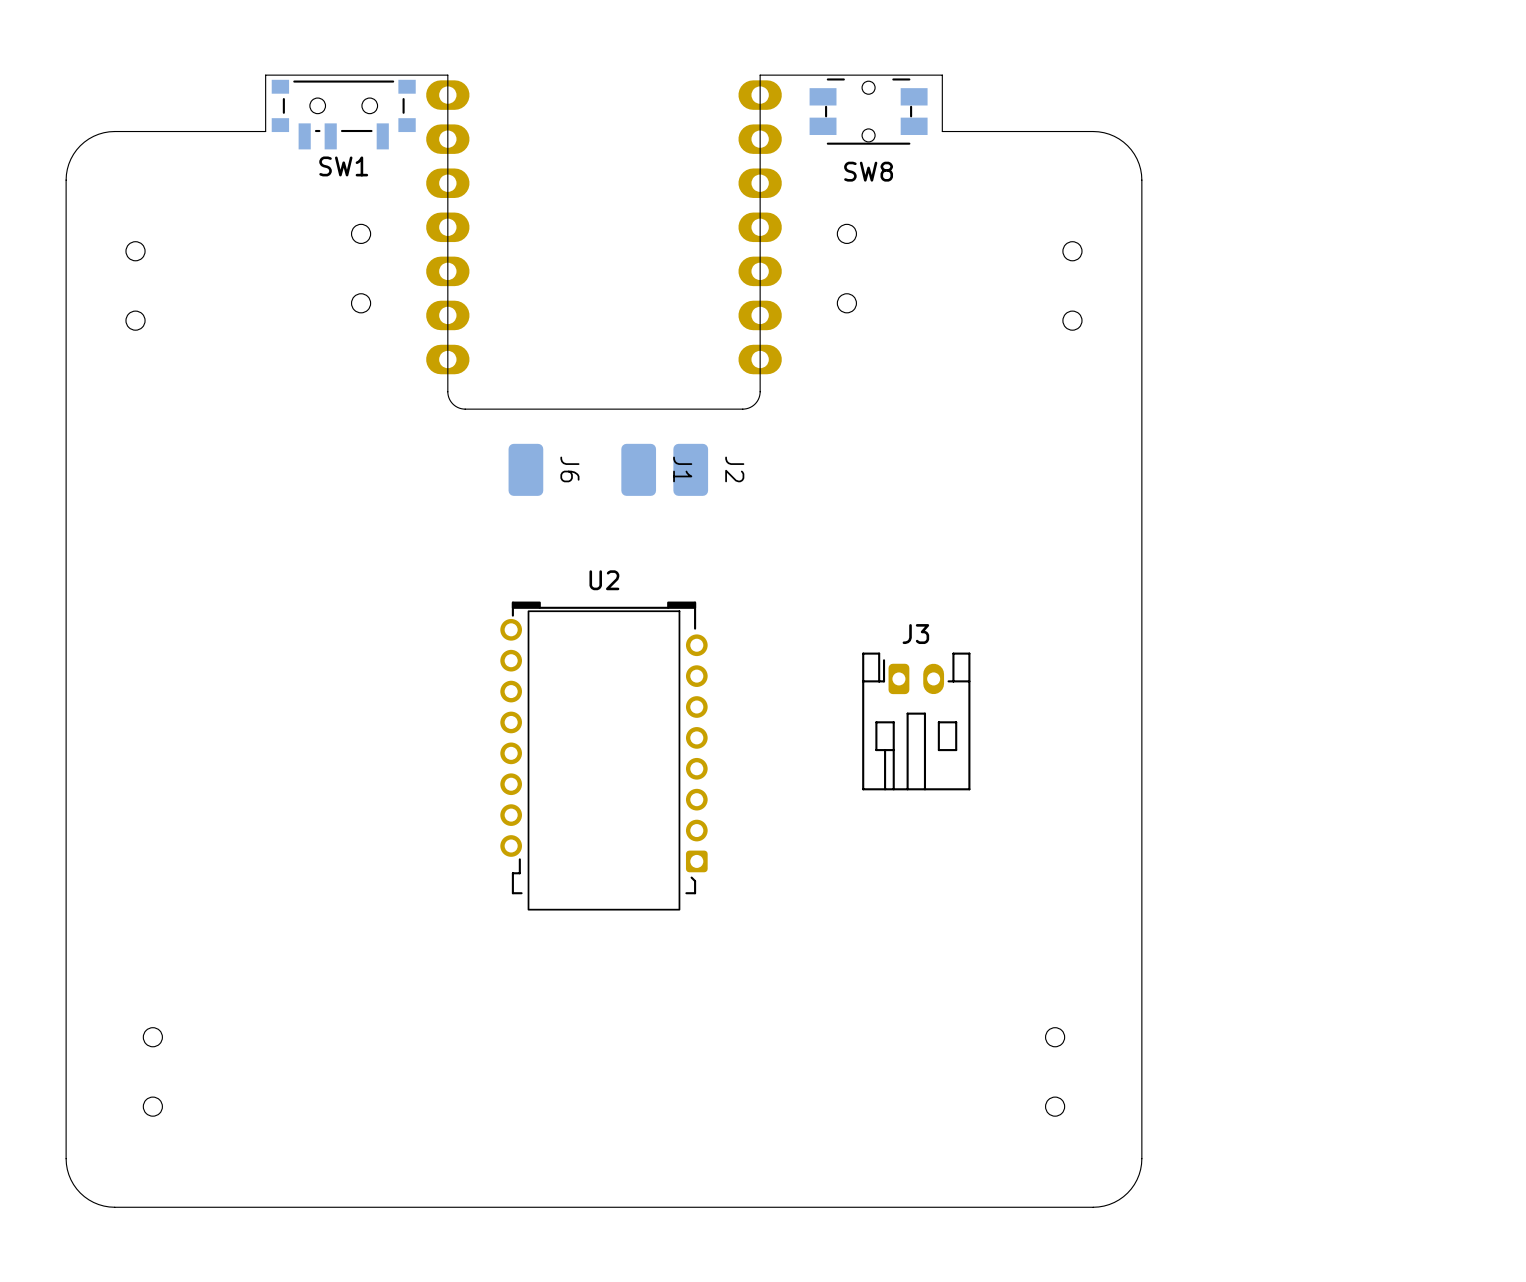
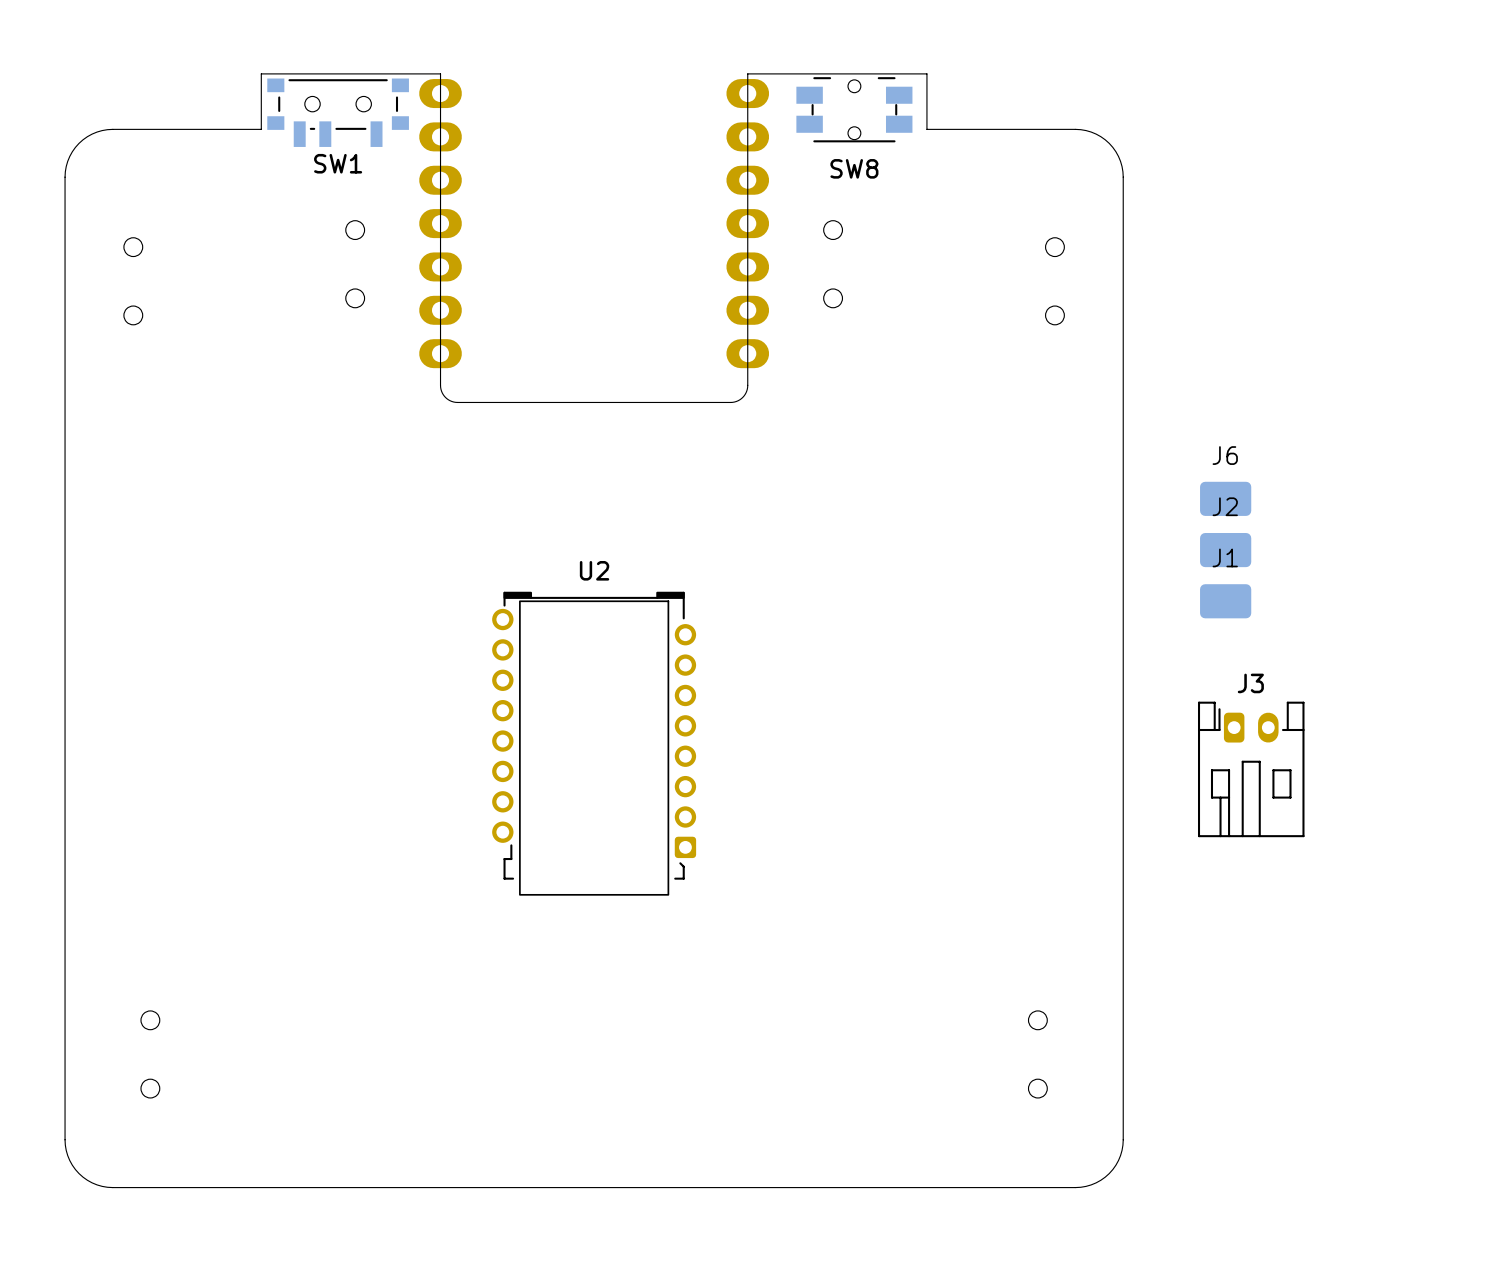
J6 rotation: 0° (525, 469) -> 90° clockwise (1225, 498)
J6 position: (525, 469) -> (1225, 498)
J6 name position: J6 (569, 469) -> J6 (1225, 455)
J1 rotation: 0° (638, 469) -> 90° clockwise (1225, 601)
J1 position: (638, 469) -> (1225, 601)
J1 name position: J1 (682, 469) -> J1 (1225, 557)
J2 rotation: 0° (690, 469) -> 90° clockwise (1225, 550)
J2 position: (690, 469) -> (1225, 550)
J2 name position: J2 (734, 469) -> J2 (1225, 506)
J3 position: (916, 721) -> (1251, 769)

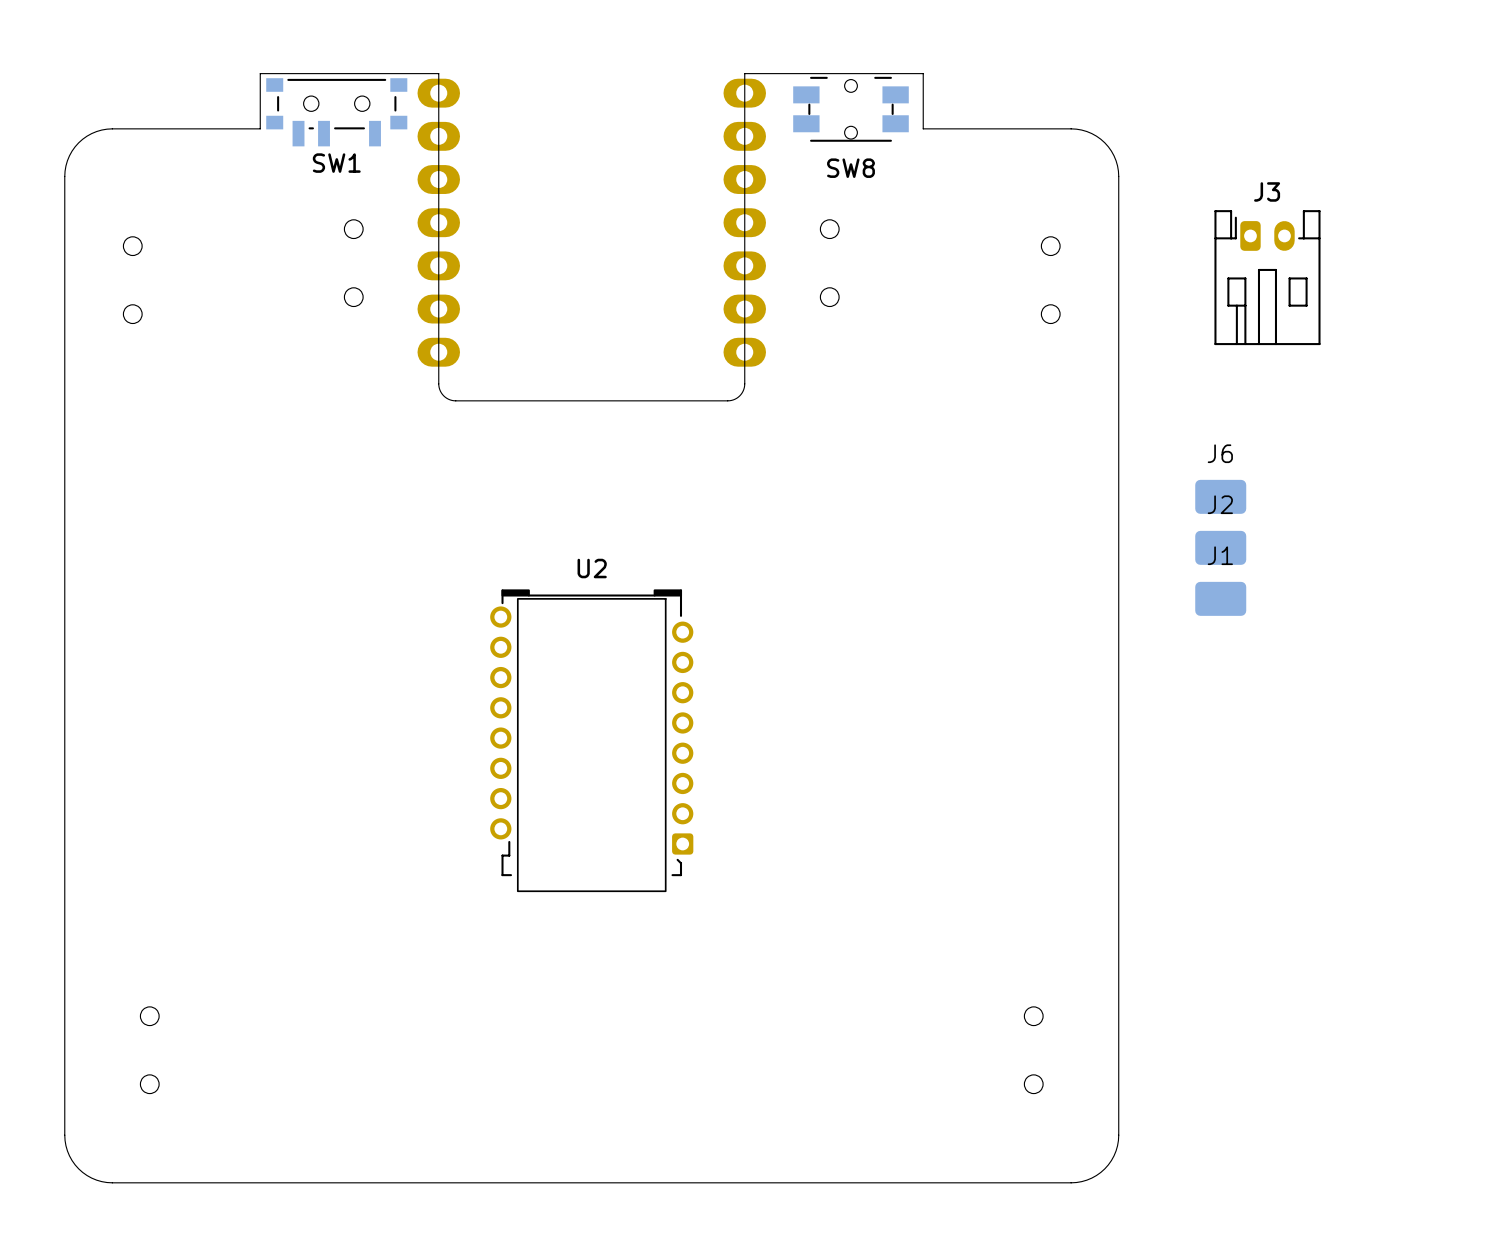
J3 position: (1251, 769) -> (1267, 277)

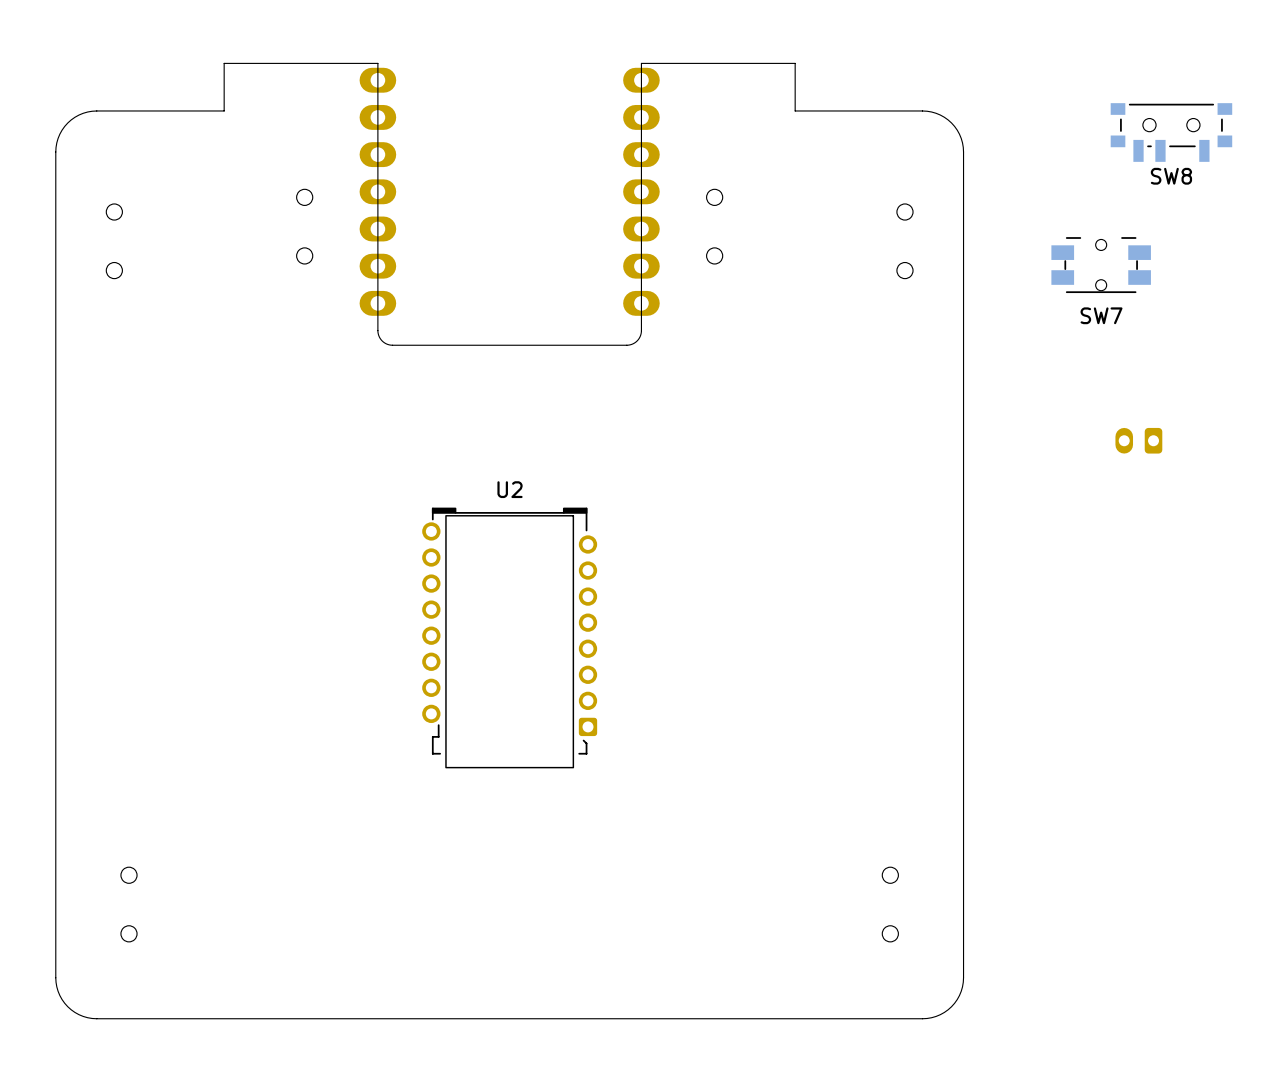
SW8 footprint: [793, 76, 909, 142] -> [1110, 103, 1233, 162]
SW1: (336, 112) -> none
J3 side: bottom (1267, 277) -> top (1138, 440)
SW7: none -> (1101, 265)
J6: (1220, 496) -> none
J2: (1220, 547) -> none
J1: (1220, 598) -> none

